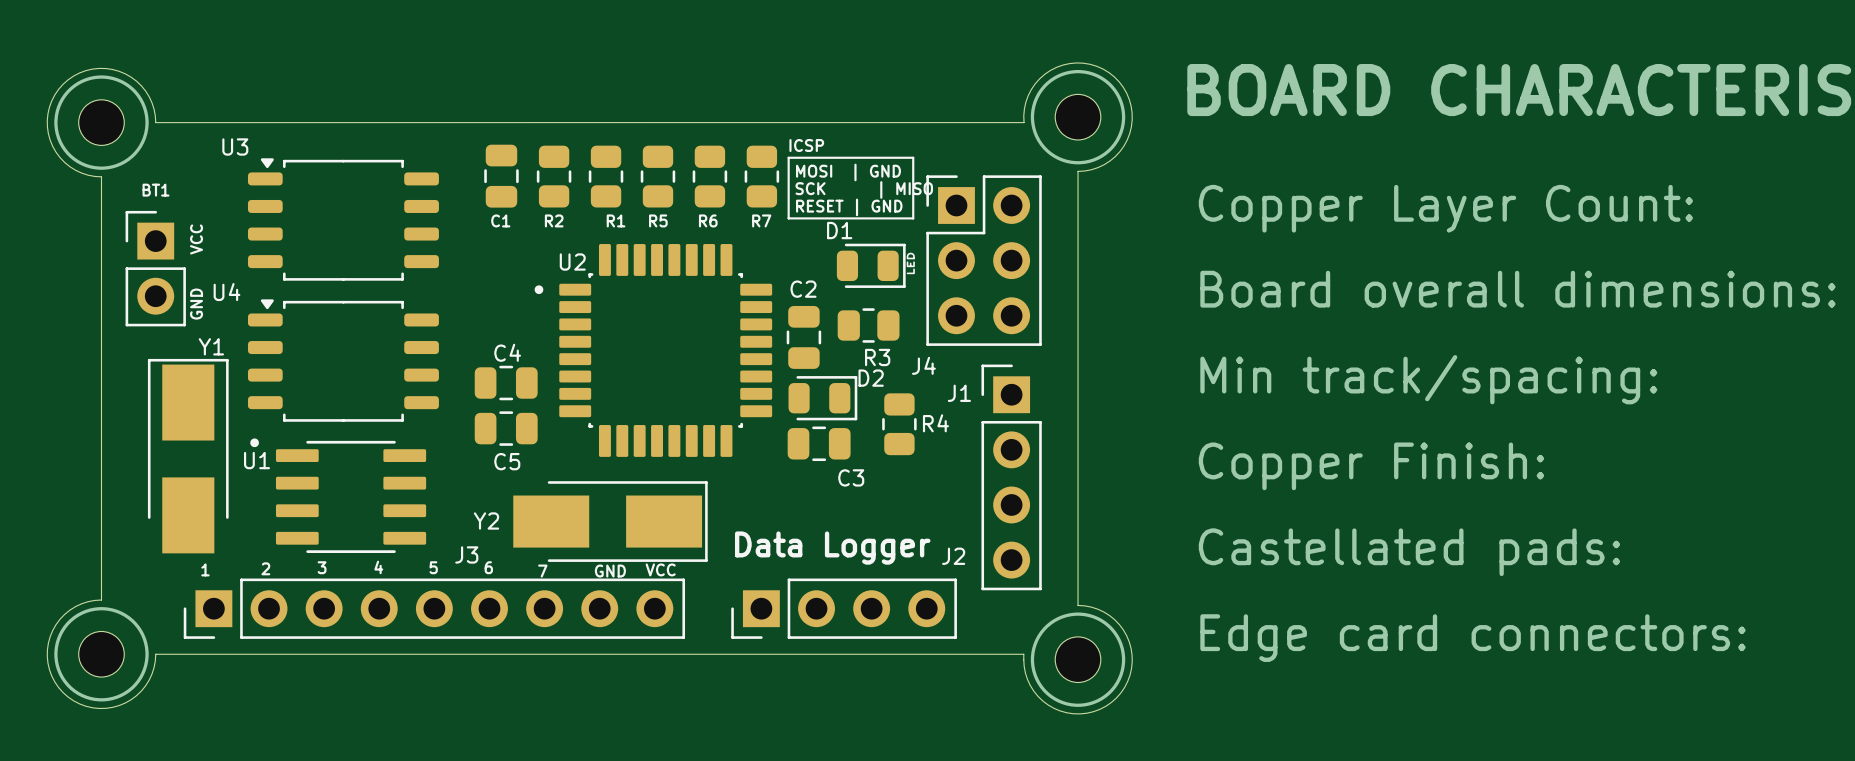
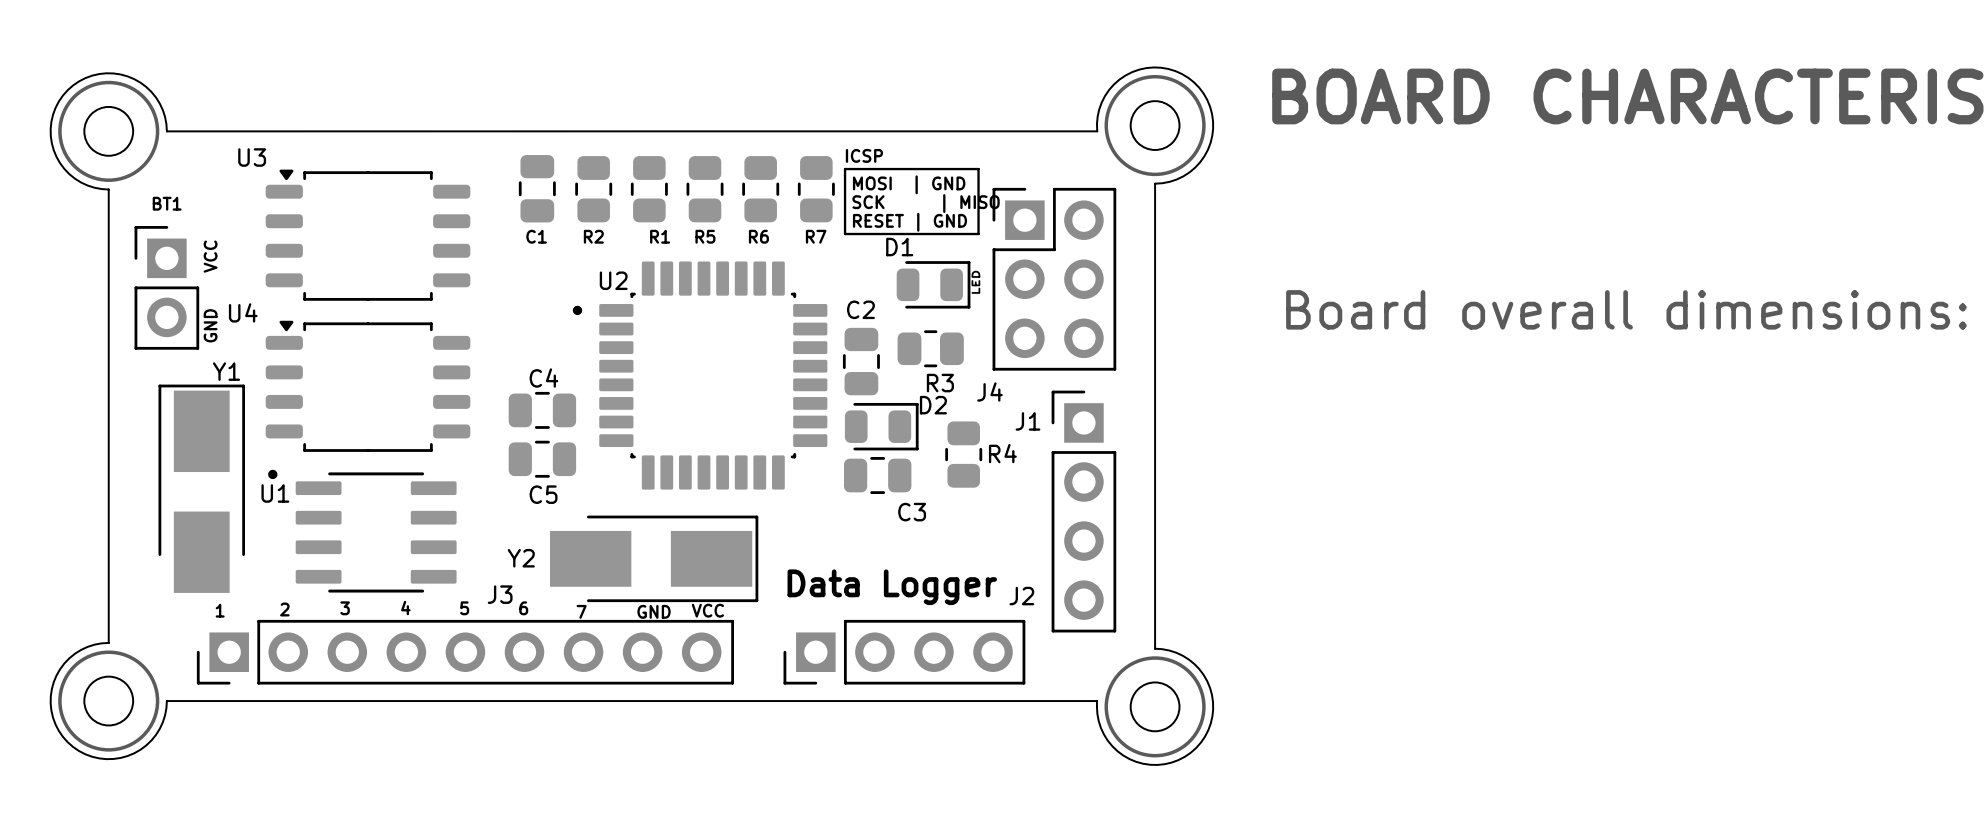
text: Copper Layer Count: (1445, 208) -> none
text: Min track/spacing: (1428, 379) -> none
text: Copper Finish: (1371, 466) -> none
text: Castellated pads: (1409, 552) -> none
text: Edge card connectors: (1472, 638) -> none

